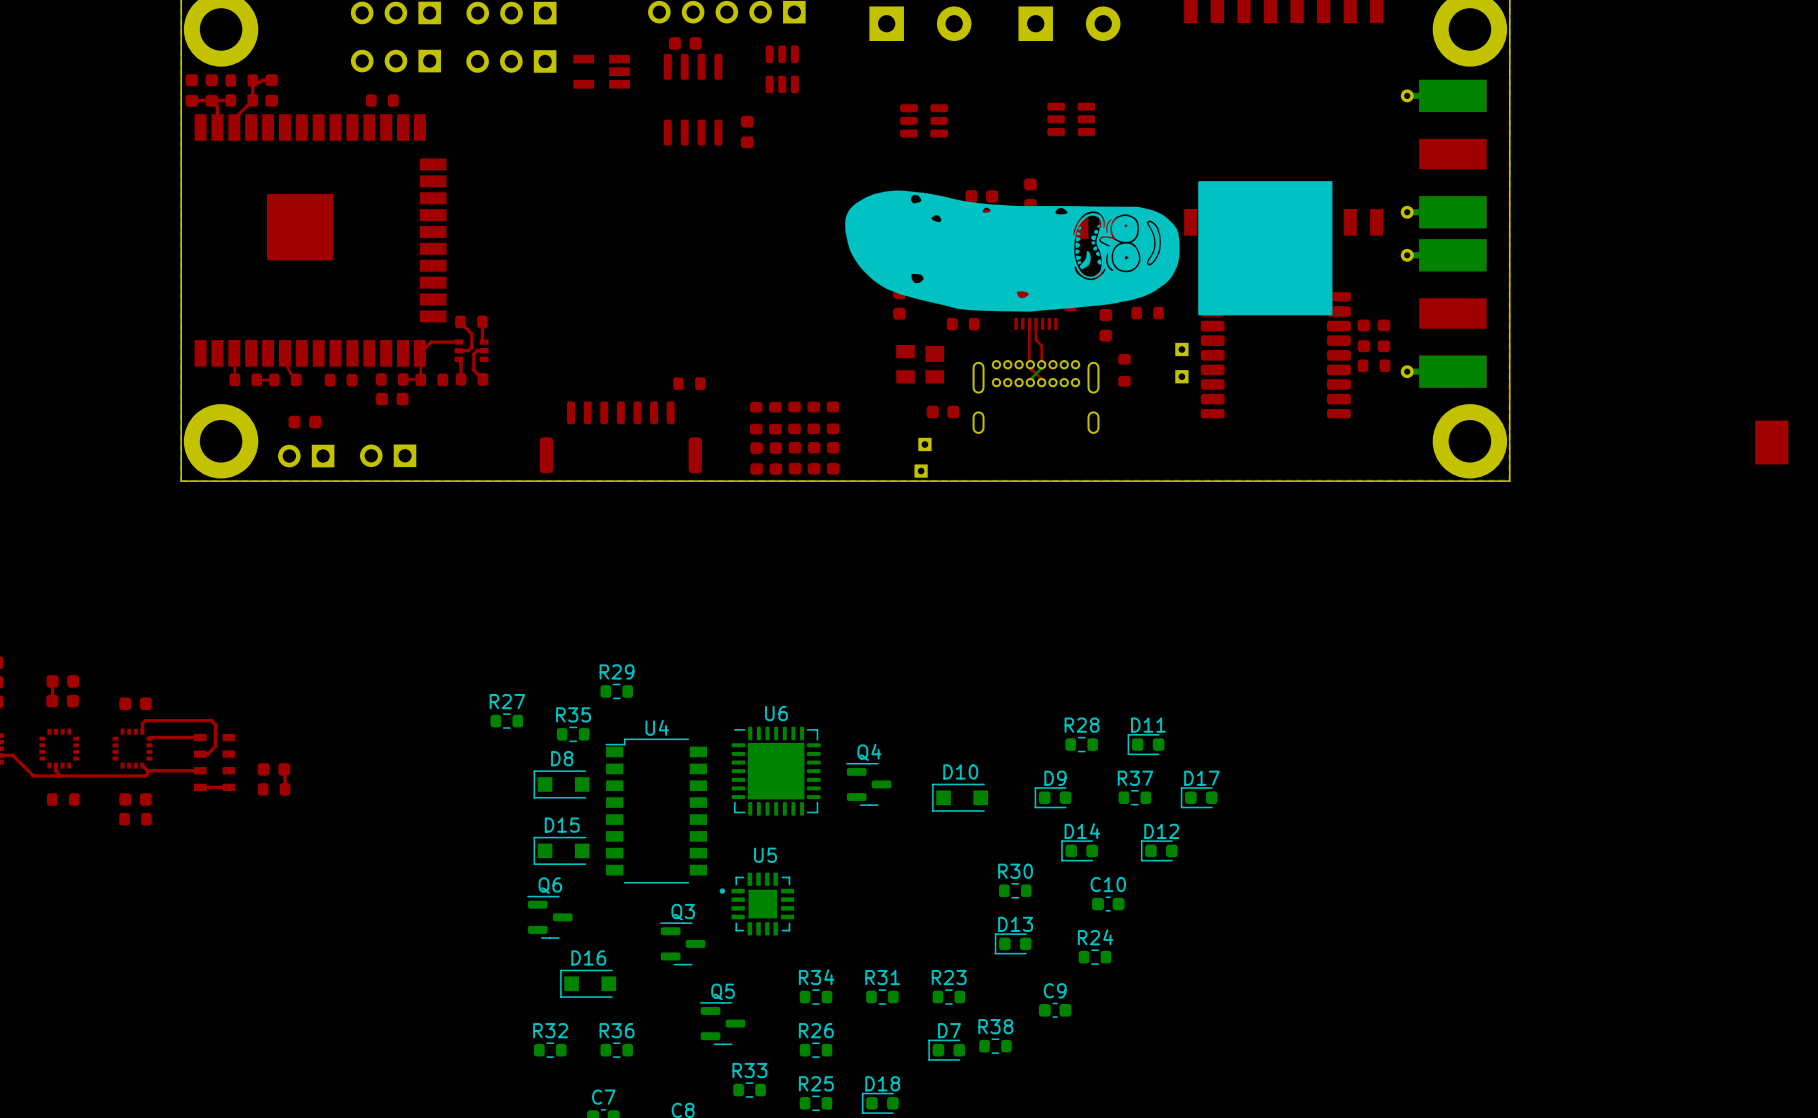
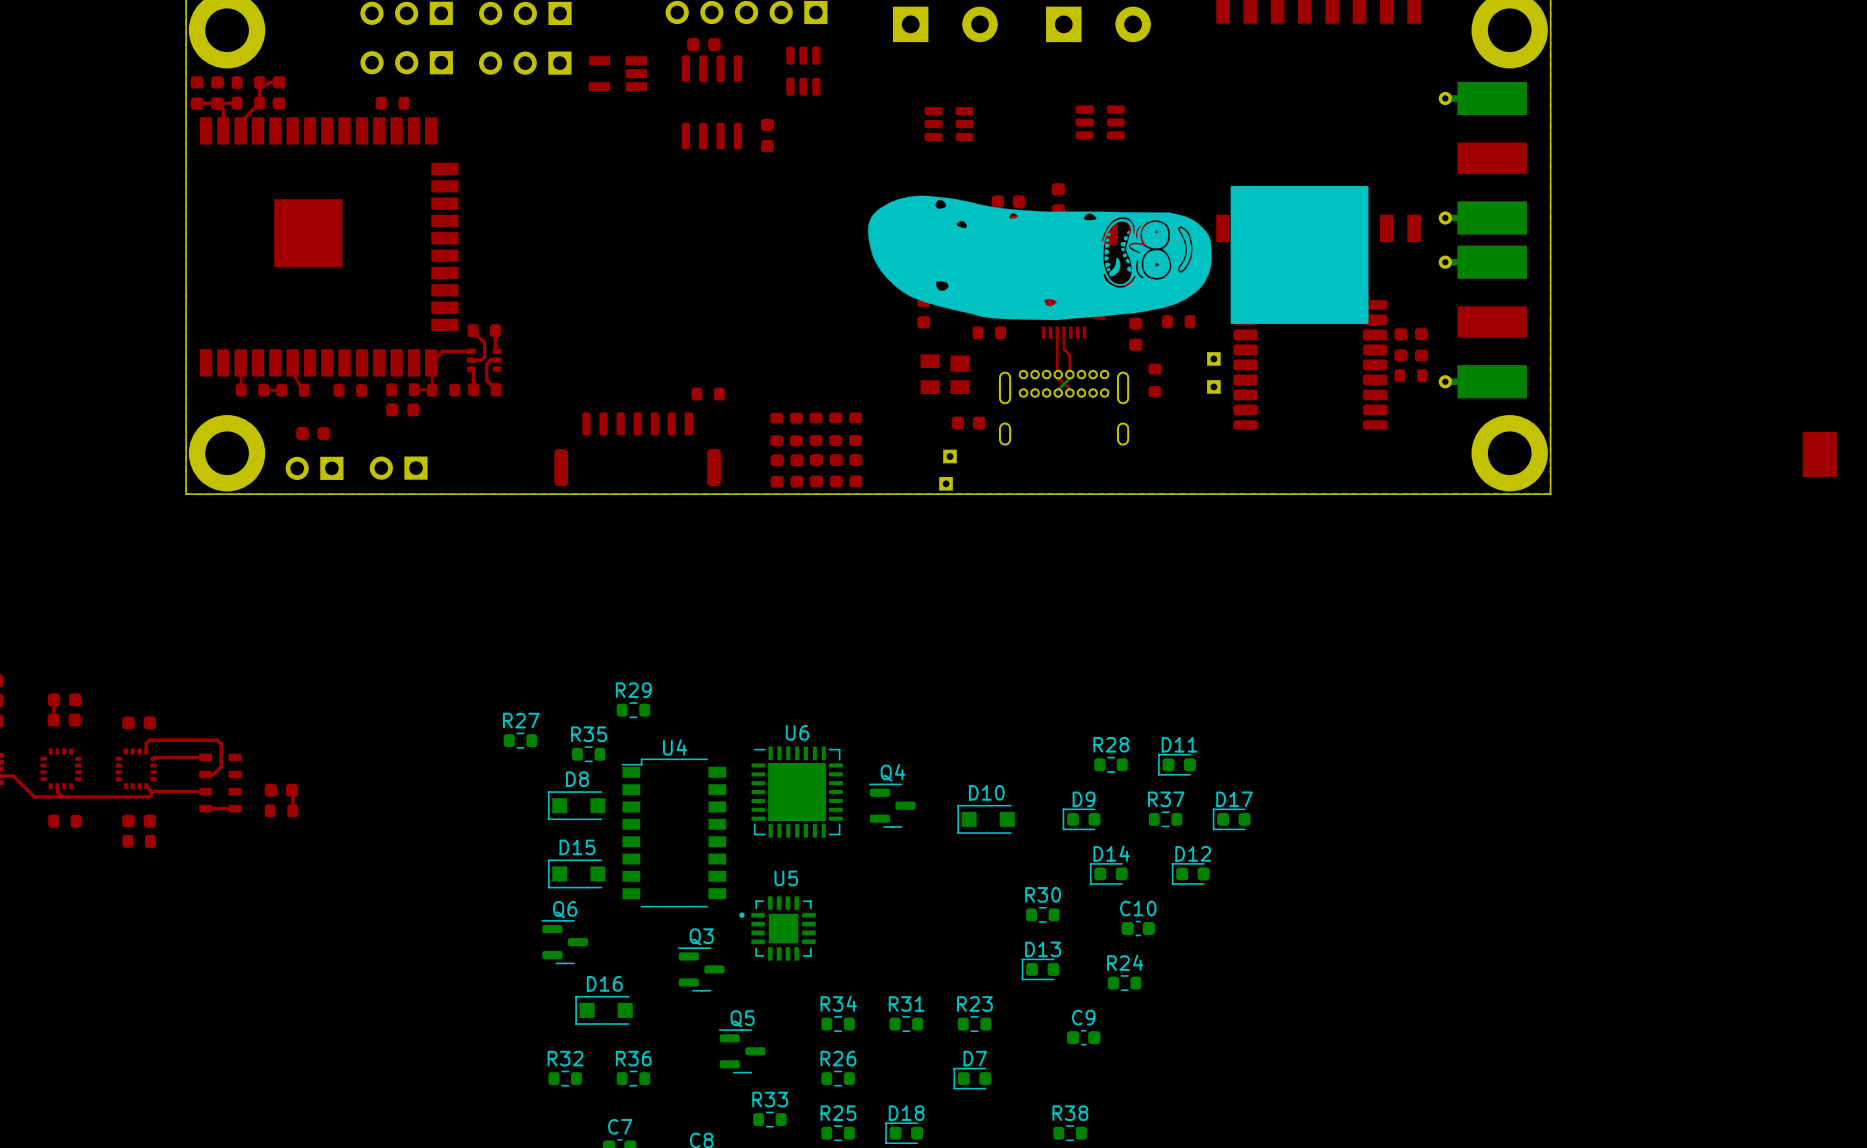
R38 position: (995, 1046) -> (1070, 1133)

